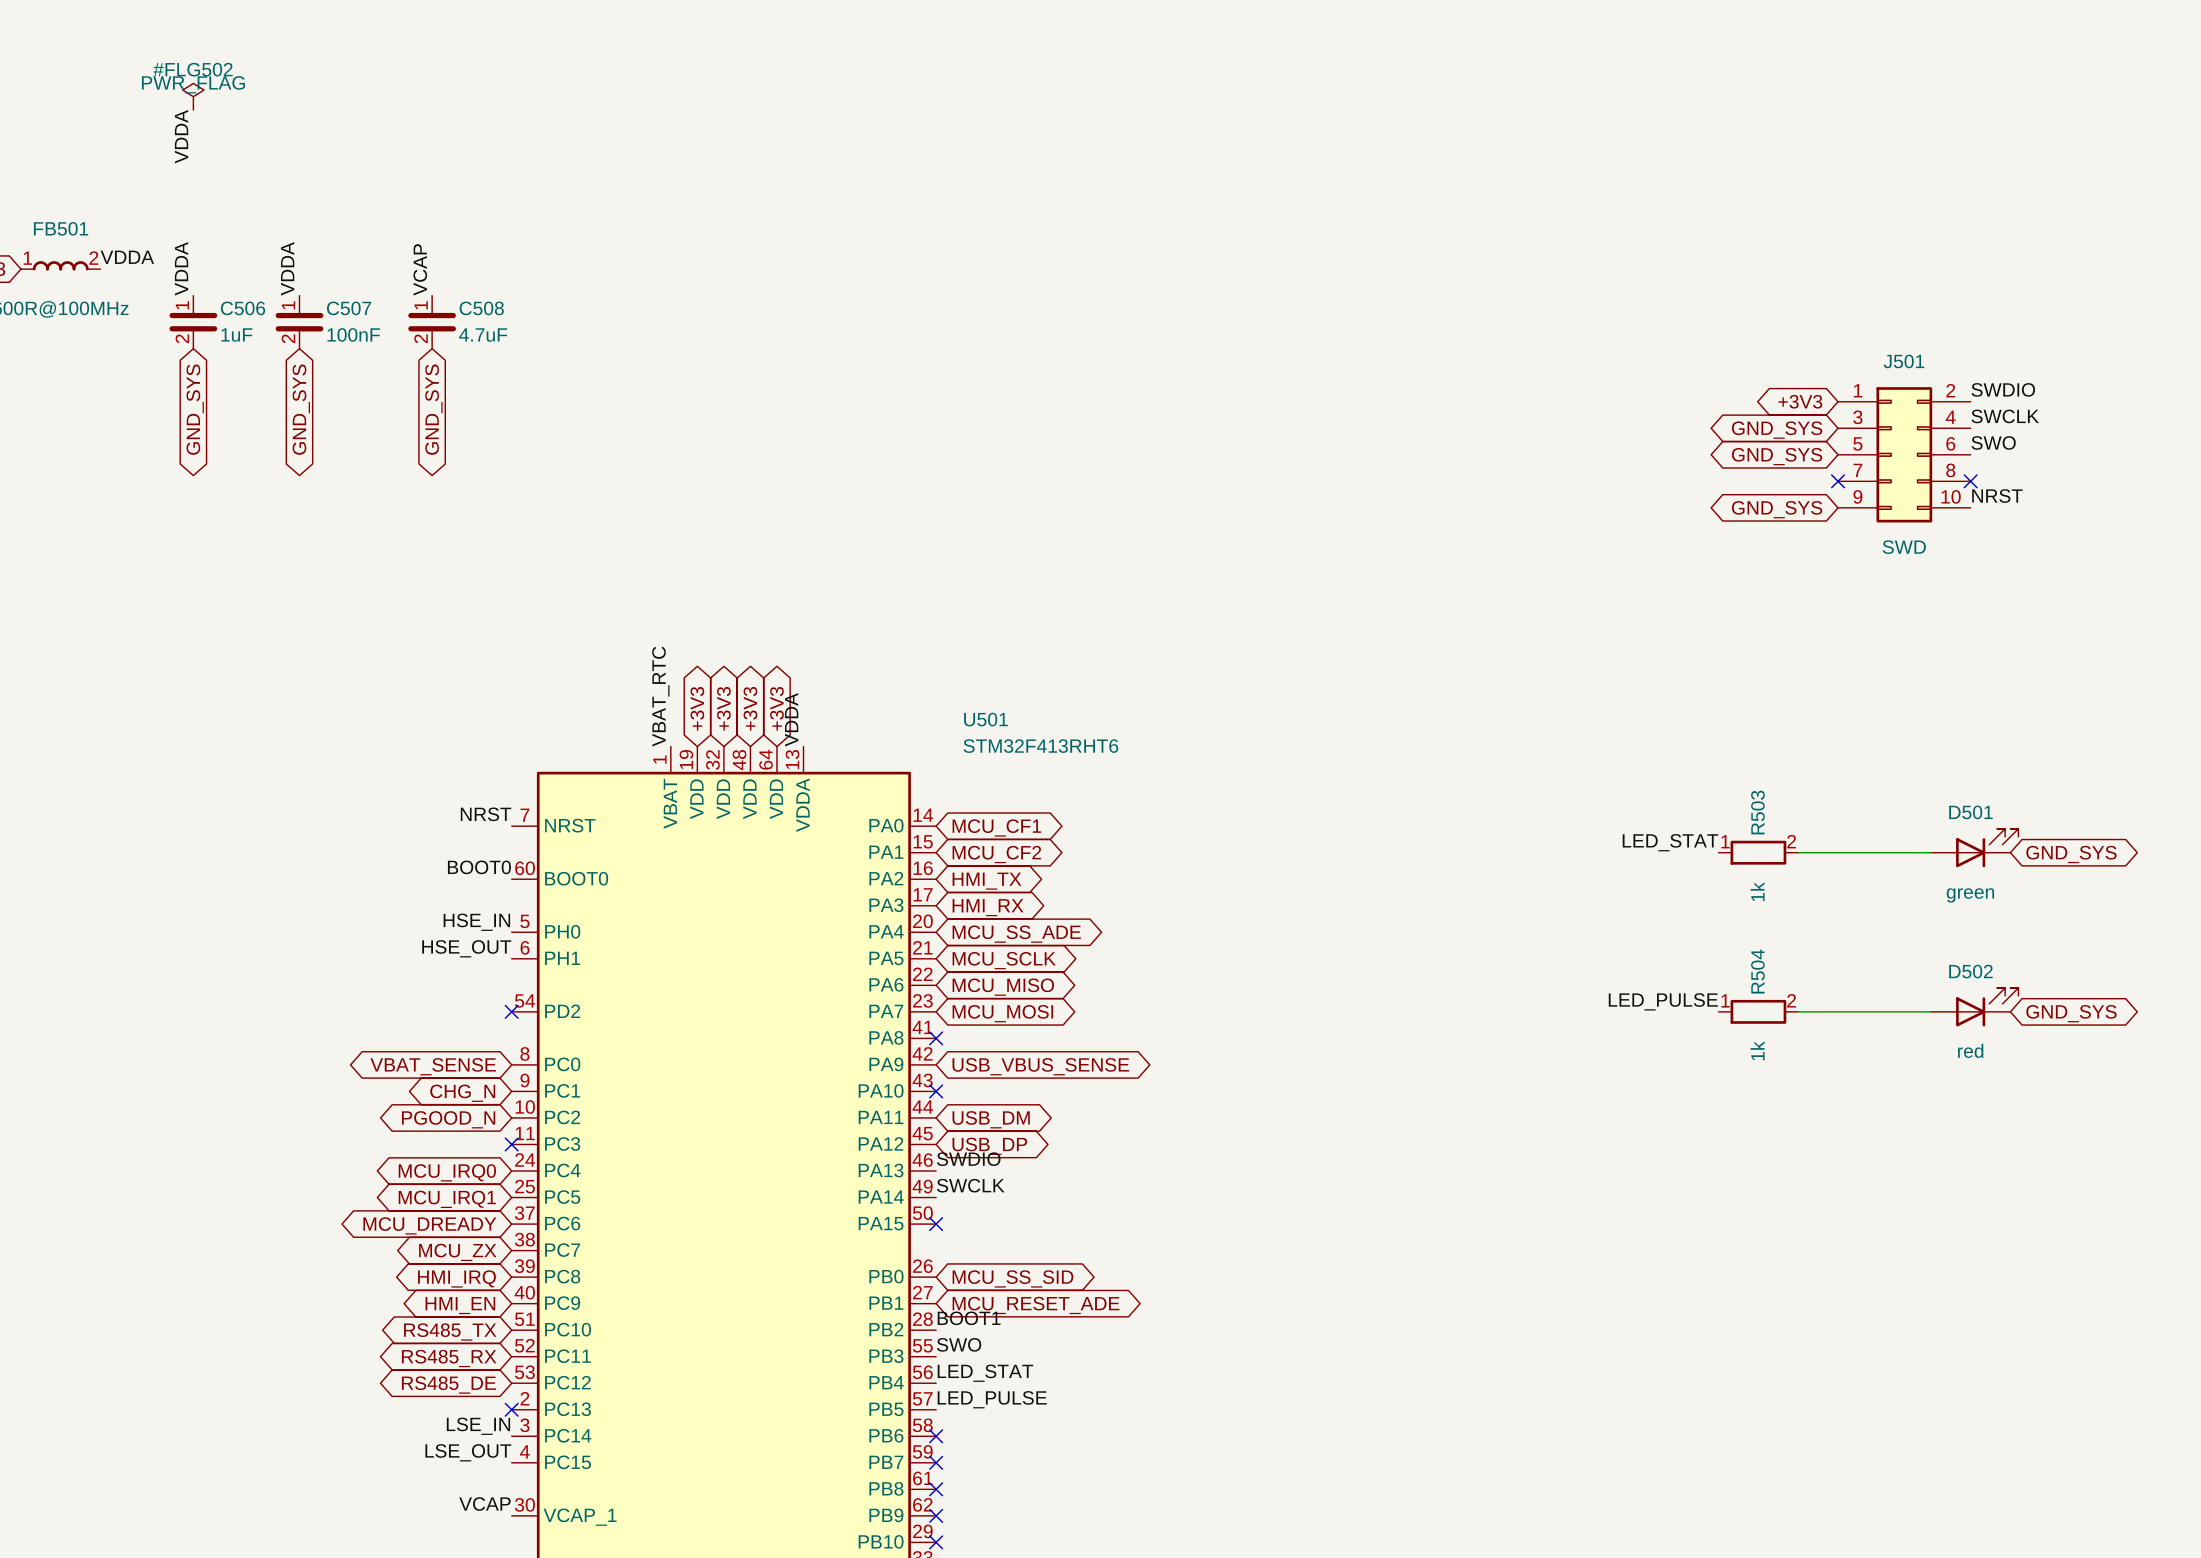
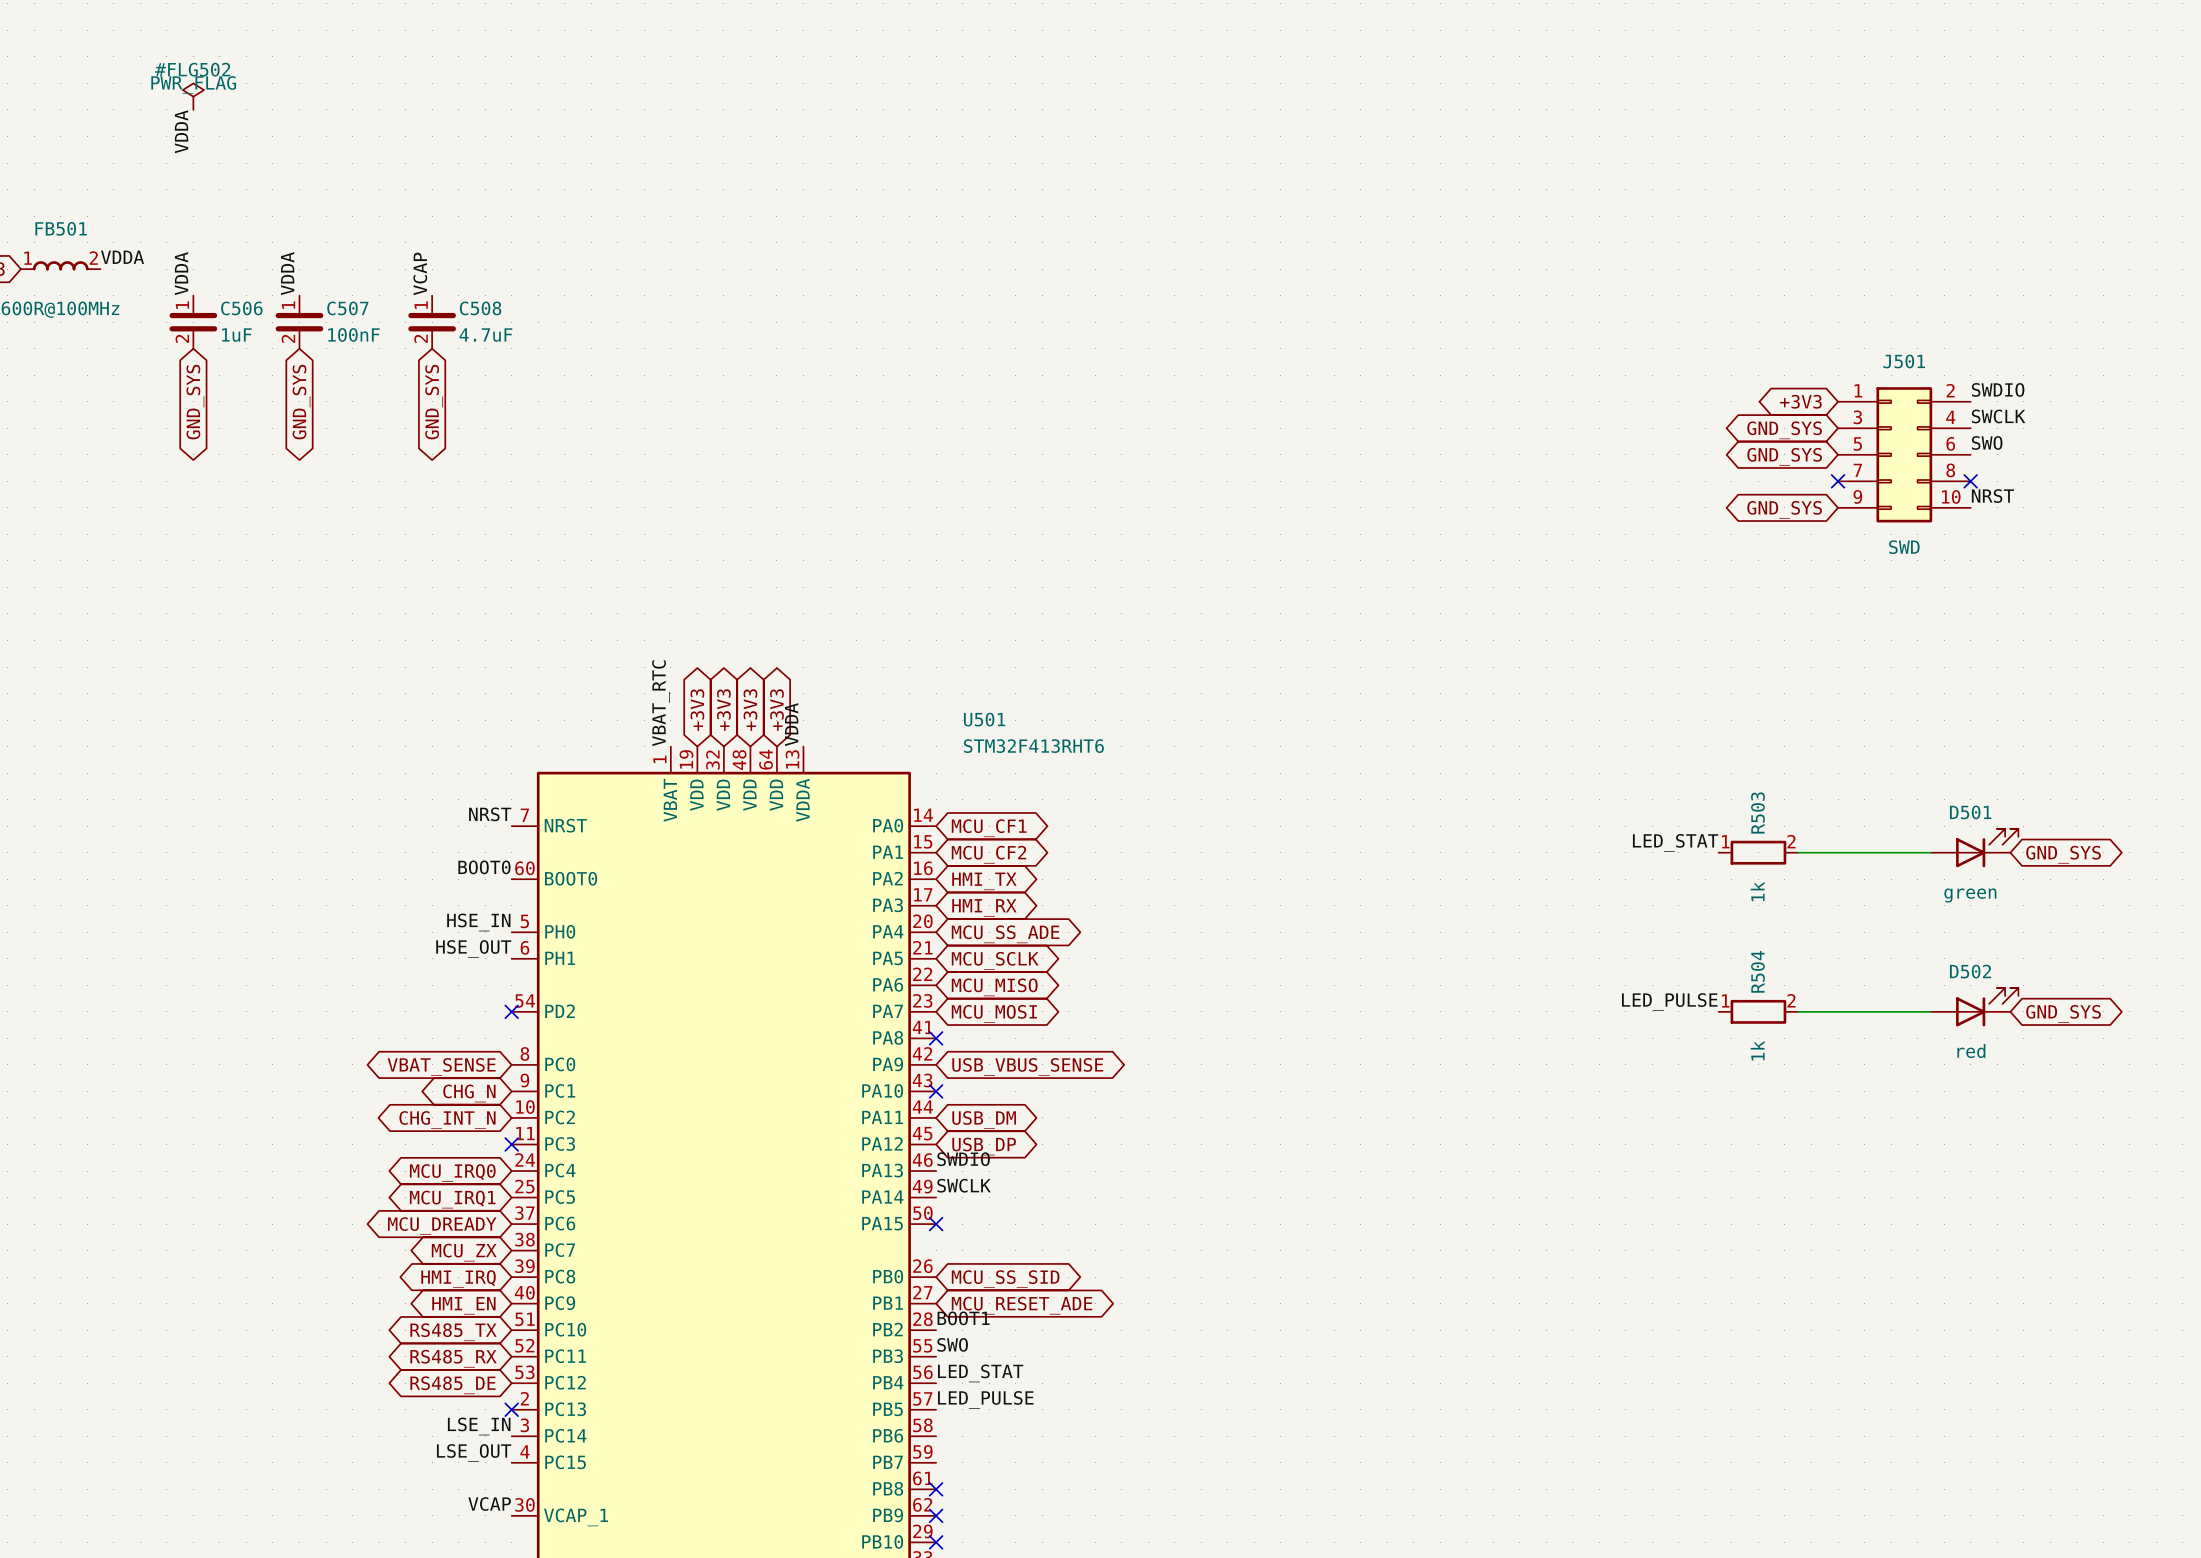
global label: PGOOD_N (448, 1119) -> CHG_INT_N (447, 1119)
no-connect mark: (936, 1436) -> none
no-connect mark: (936, 1462) -> none

